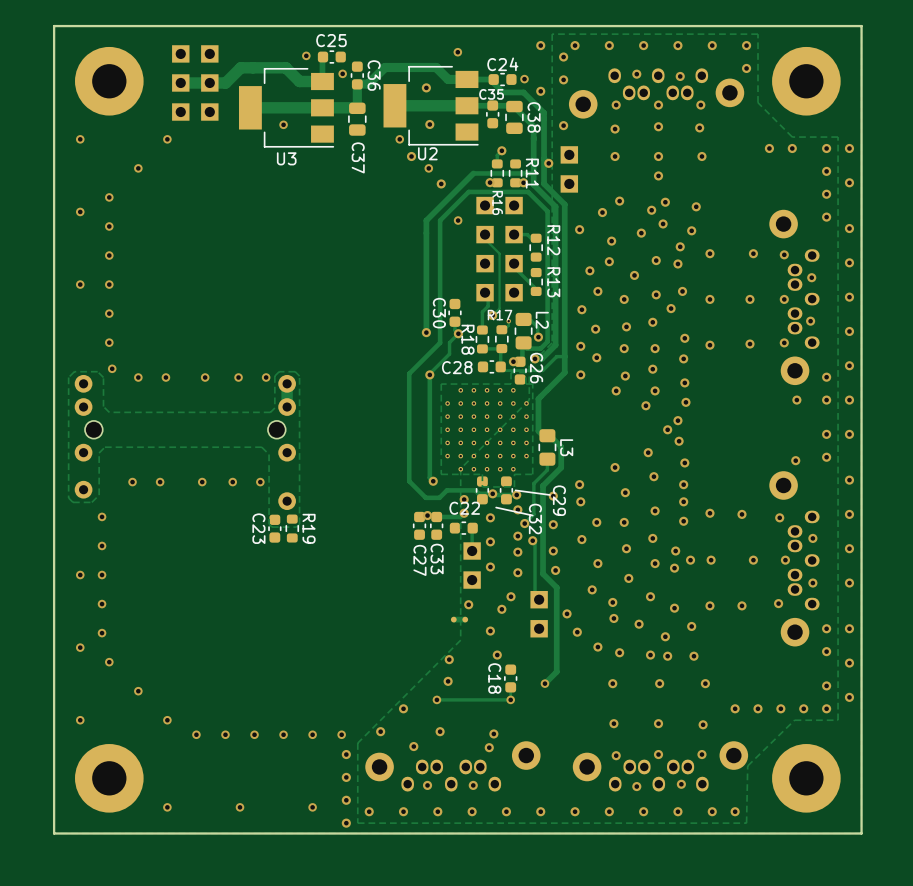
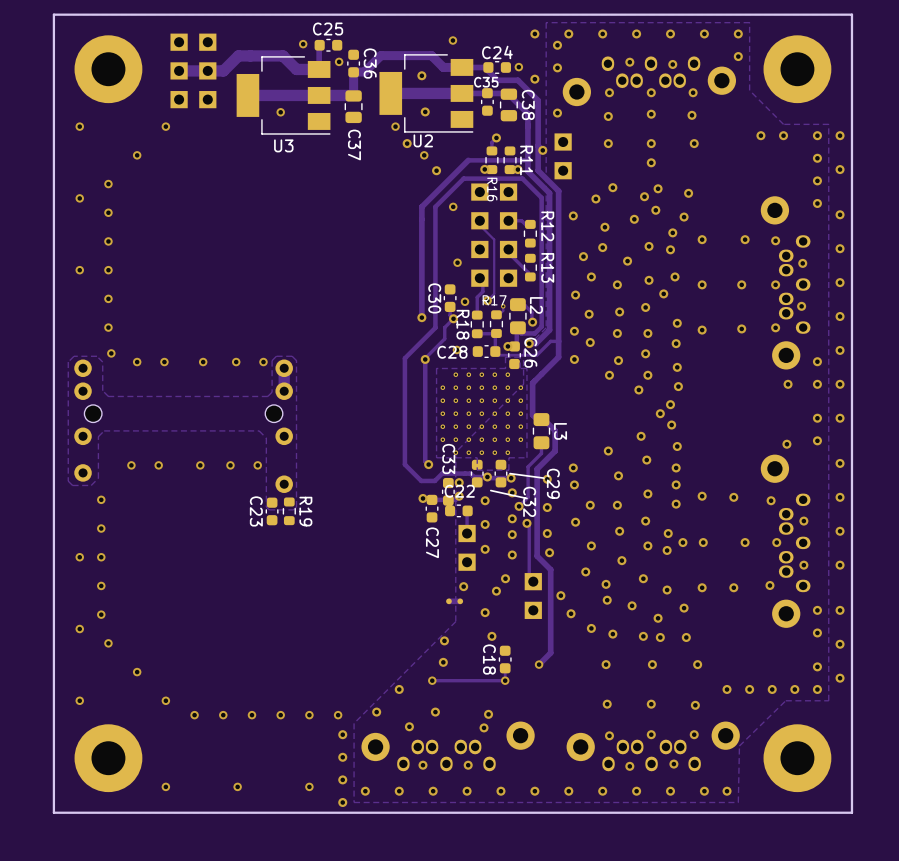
via: none -> (457, 262)
via: none -> (465, 301)
via: none -> (456, 349)
C33: none -> (448, 491)
C27: (419, 525) -> none
C33 name: C33 (437, 559) -> C27 (432, 542)

